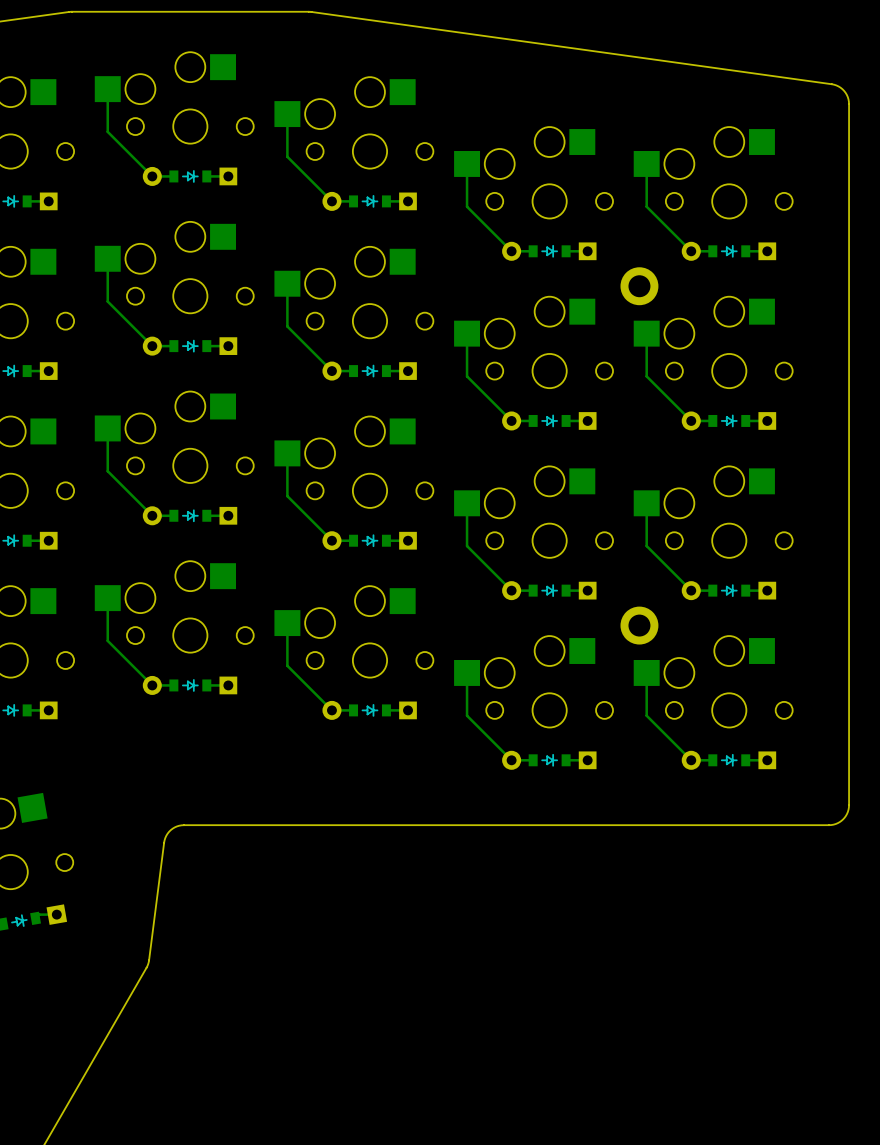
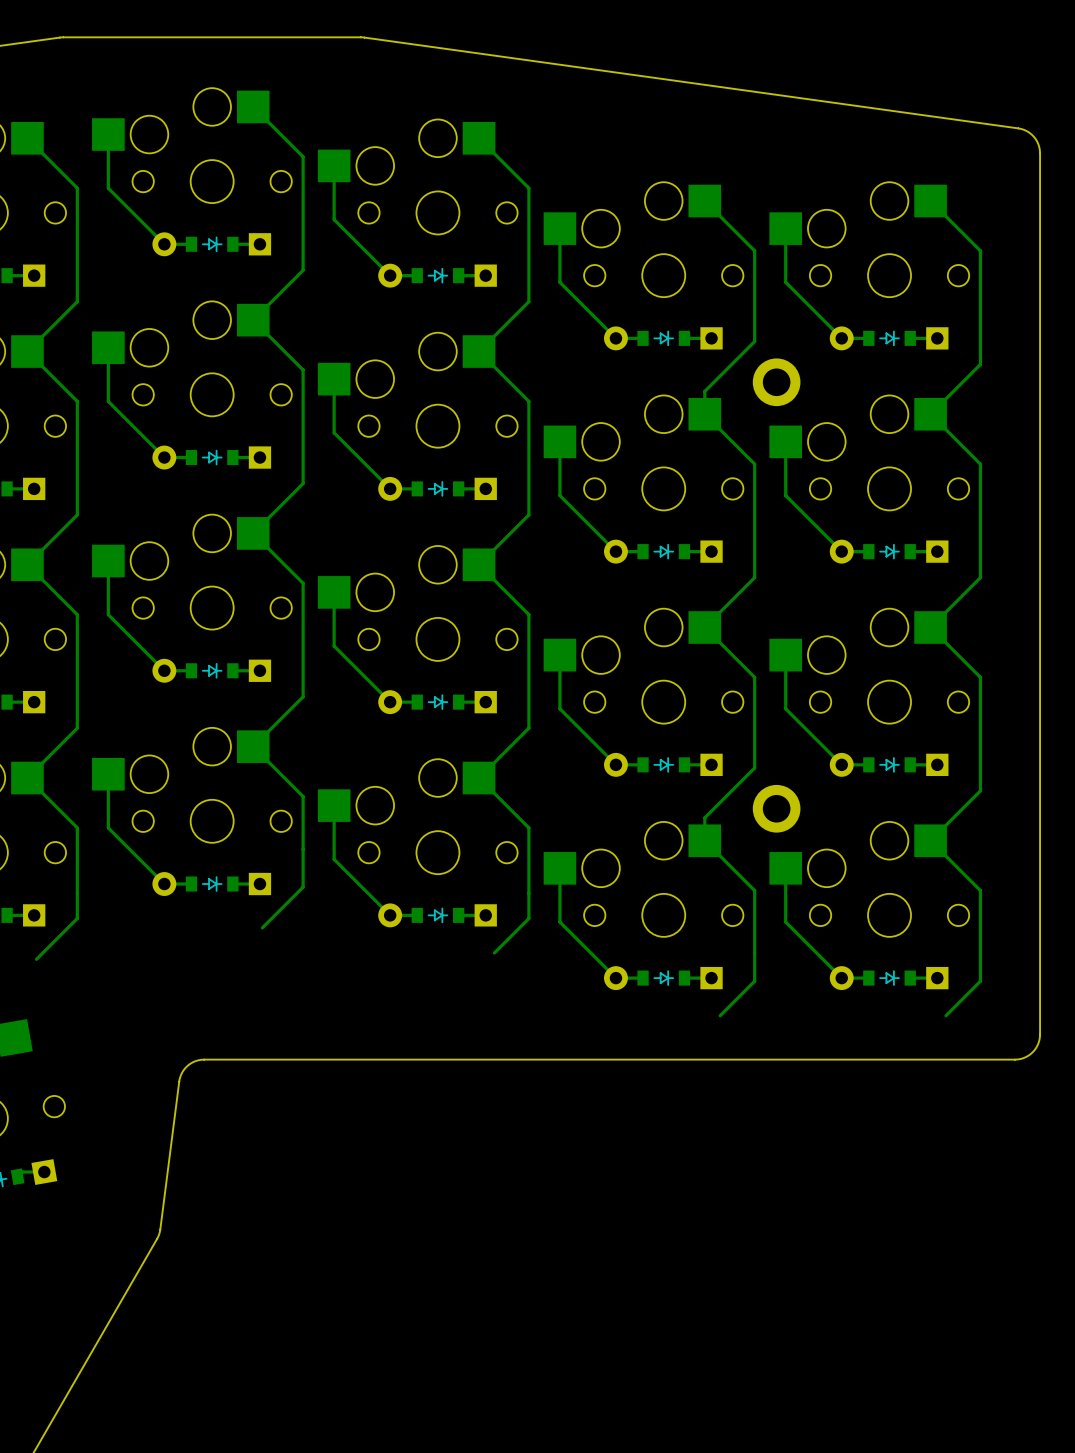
track: none -> (253, 106) (303, 156) (303, 270) (253, 320) (303, 370) (303, 483) (253, 533) (303, 583) (303, 696) (253, 746) (303, 796) (303, 887) (262, 927)
track: none -> (27, 138) (77, 188) (77, 301) (27, 351) (77, 401) (77, 514) (27, 564) (77, 614) (77, 728) (27, 778) (77, 827) (77, 918) (36, 959)
track: none -> (479, 138) (528, 188) (528, 301) (479, 351) (528, 401) (528, 514) (479, 564) (528, 614) (528, 728) (479, 778) (528, 827) (528, 918) (494, 953)
track: none -> (704, 201) (754, 250) (754, 341) (704, 391) (704, 414) (754, 464) (754, 577) (704, 627) (754, 677) (754, 767) (704, 817) (704, 840) (754, 890) (754, 981) (720, 1015)
track: none -> (930, 201) (980, 250) (980, 364) (930, 414) (980, 464) (980, 577) (930, 627) (980, 677) (980, 790) (930, 840) (980, 890) (980, 981) (945, 1015)

